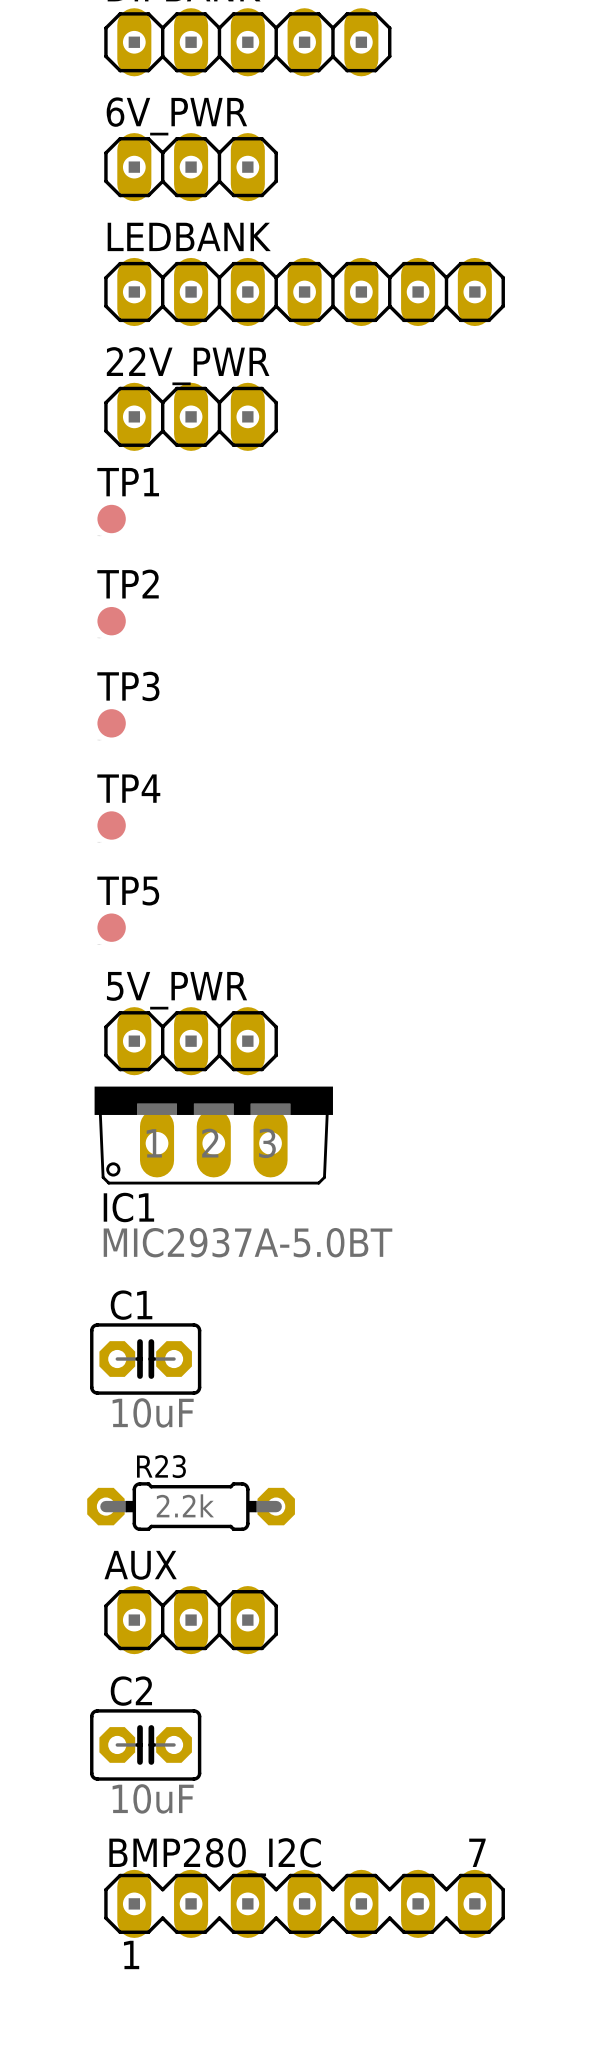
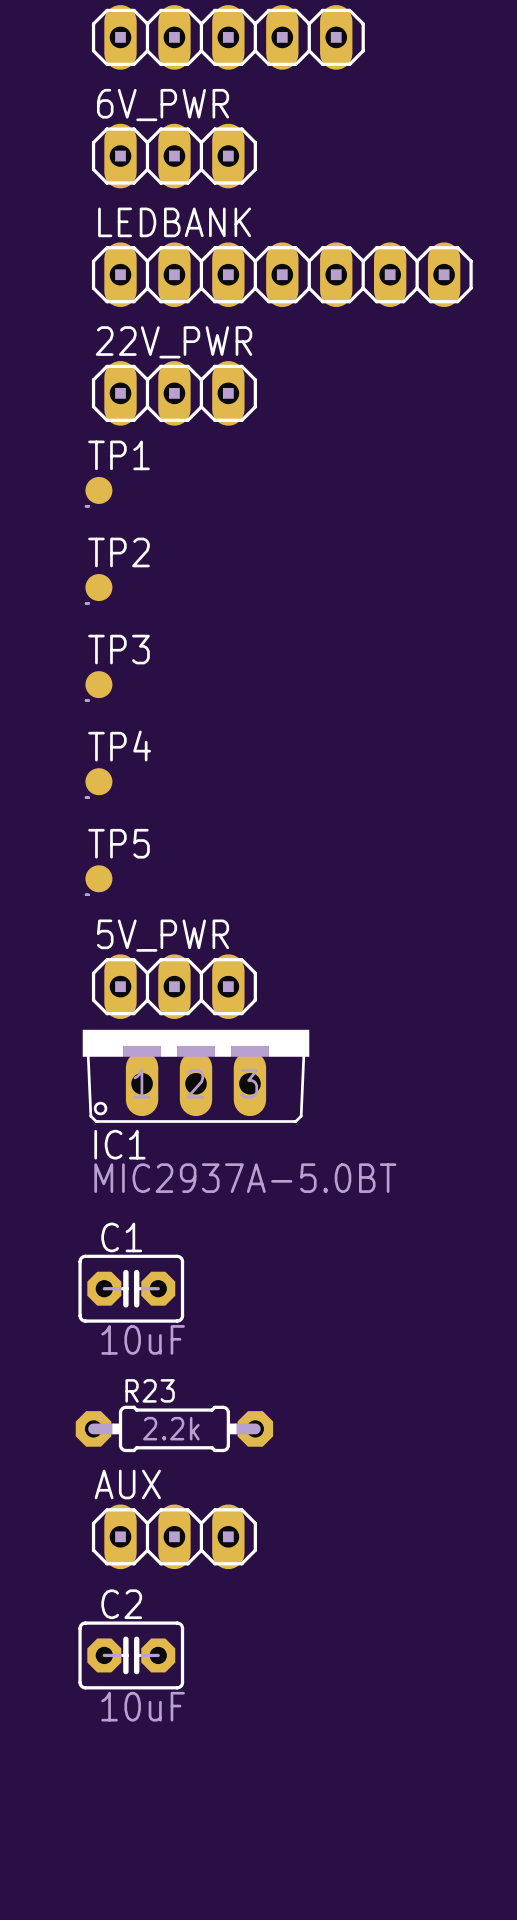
BMP280_I2C: (304, 1903) -> none

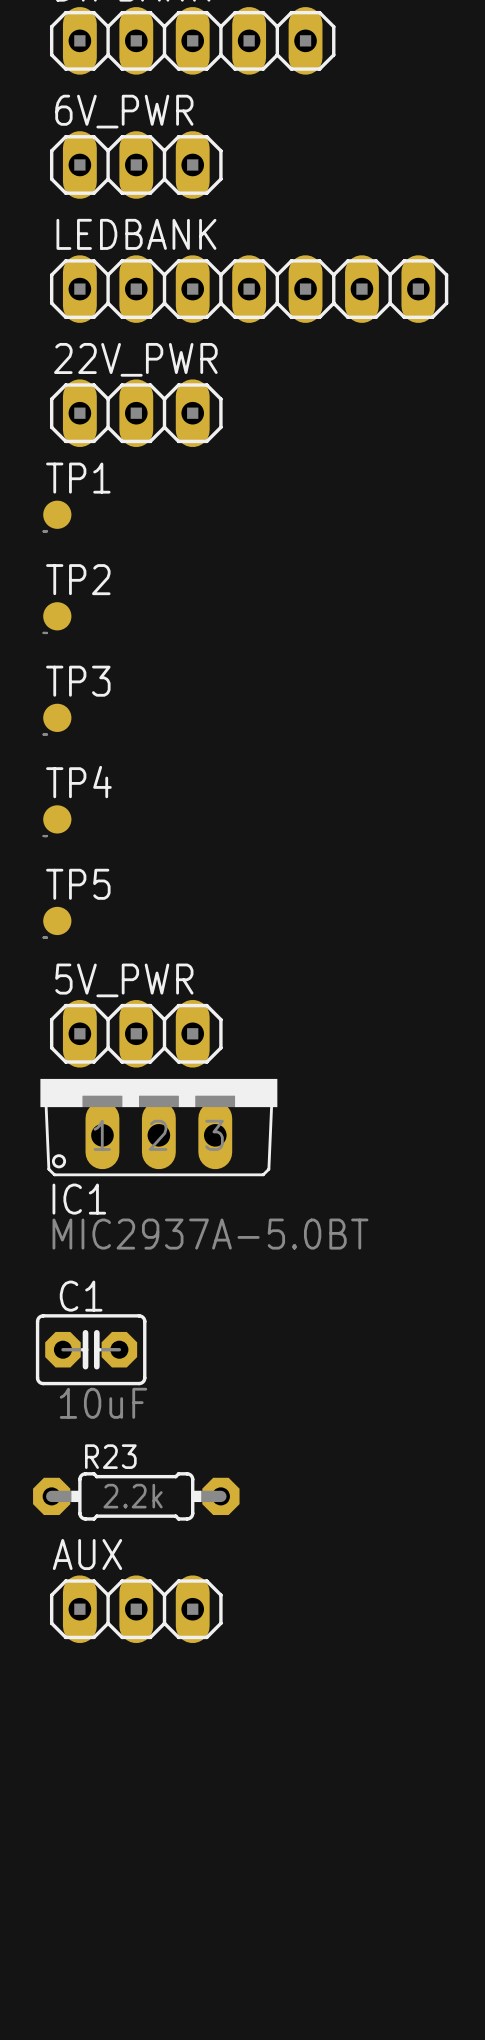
C2: 10uF (131, 1655) -> none

